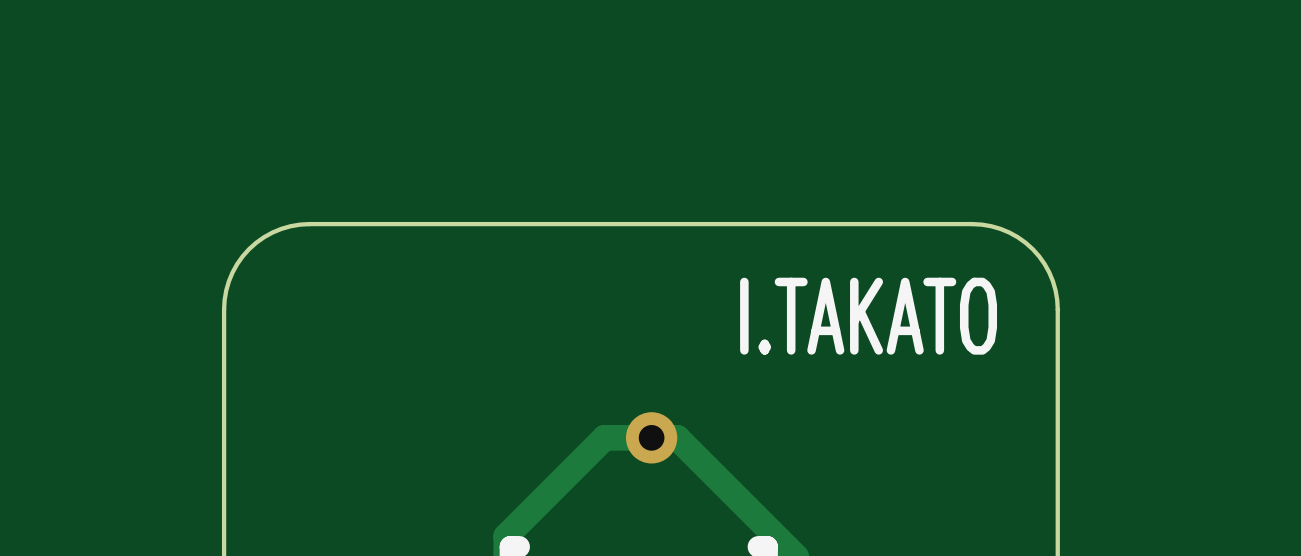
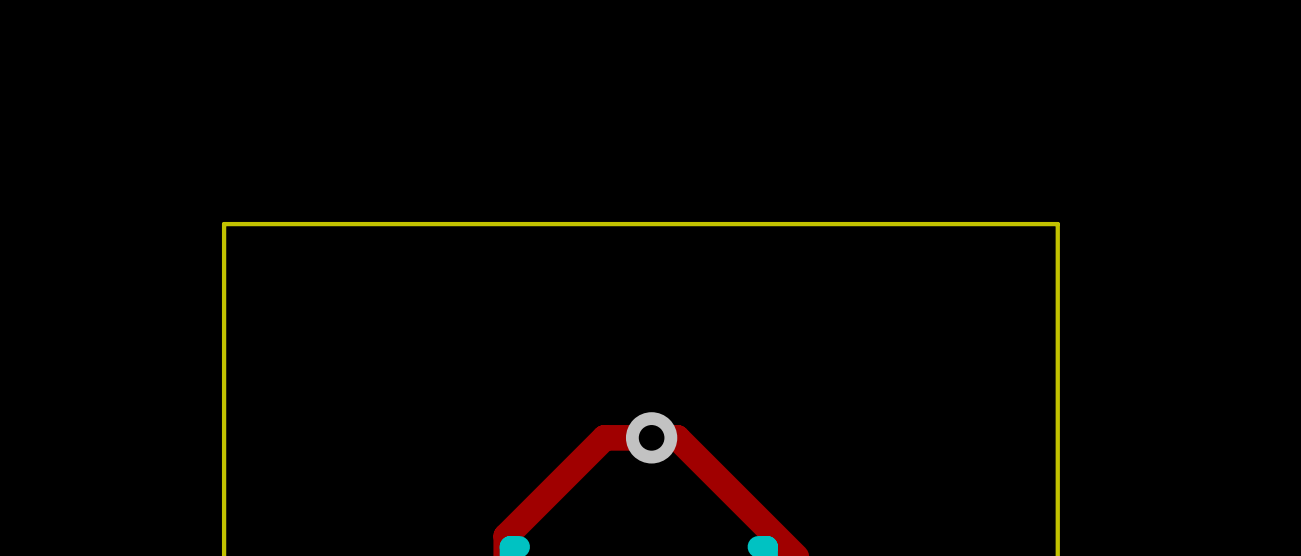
board edge: (309, 224) (290, 226) (272, 232) (249, 249) (232, 272) (226, 290) (224, 309) -> (309, 224) (224, 224) (224, 309)
board edge: (972, 224) (991, 226) (1009, 232) (1032, 249) (1049, 272) (1055, 290) (1057, 309) -> (972, 224) (1057, 224) (1057, 309)
text: I.TAKATO (868, 316) -> none

